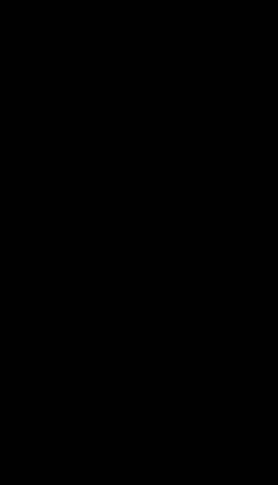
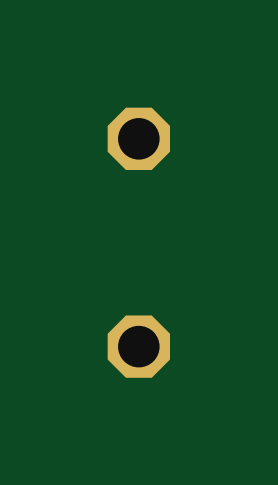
part: none -> (138, 138)
part: none -> (138, 346)

